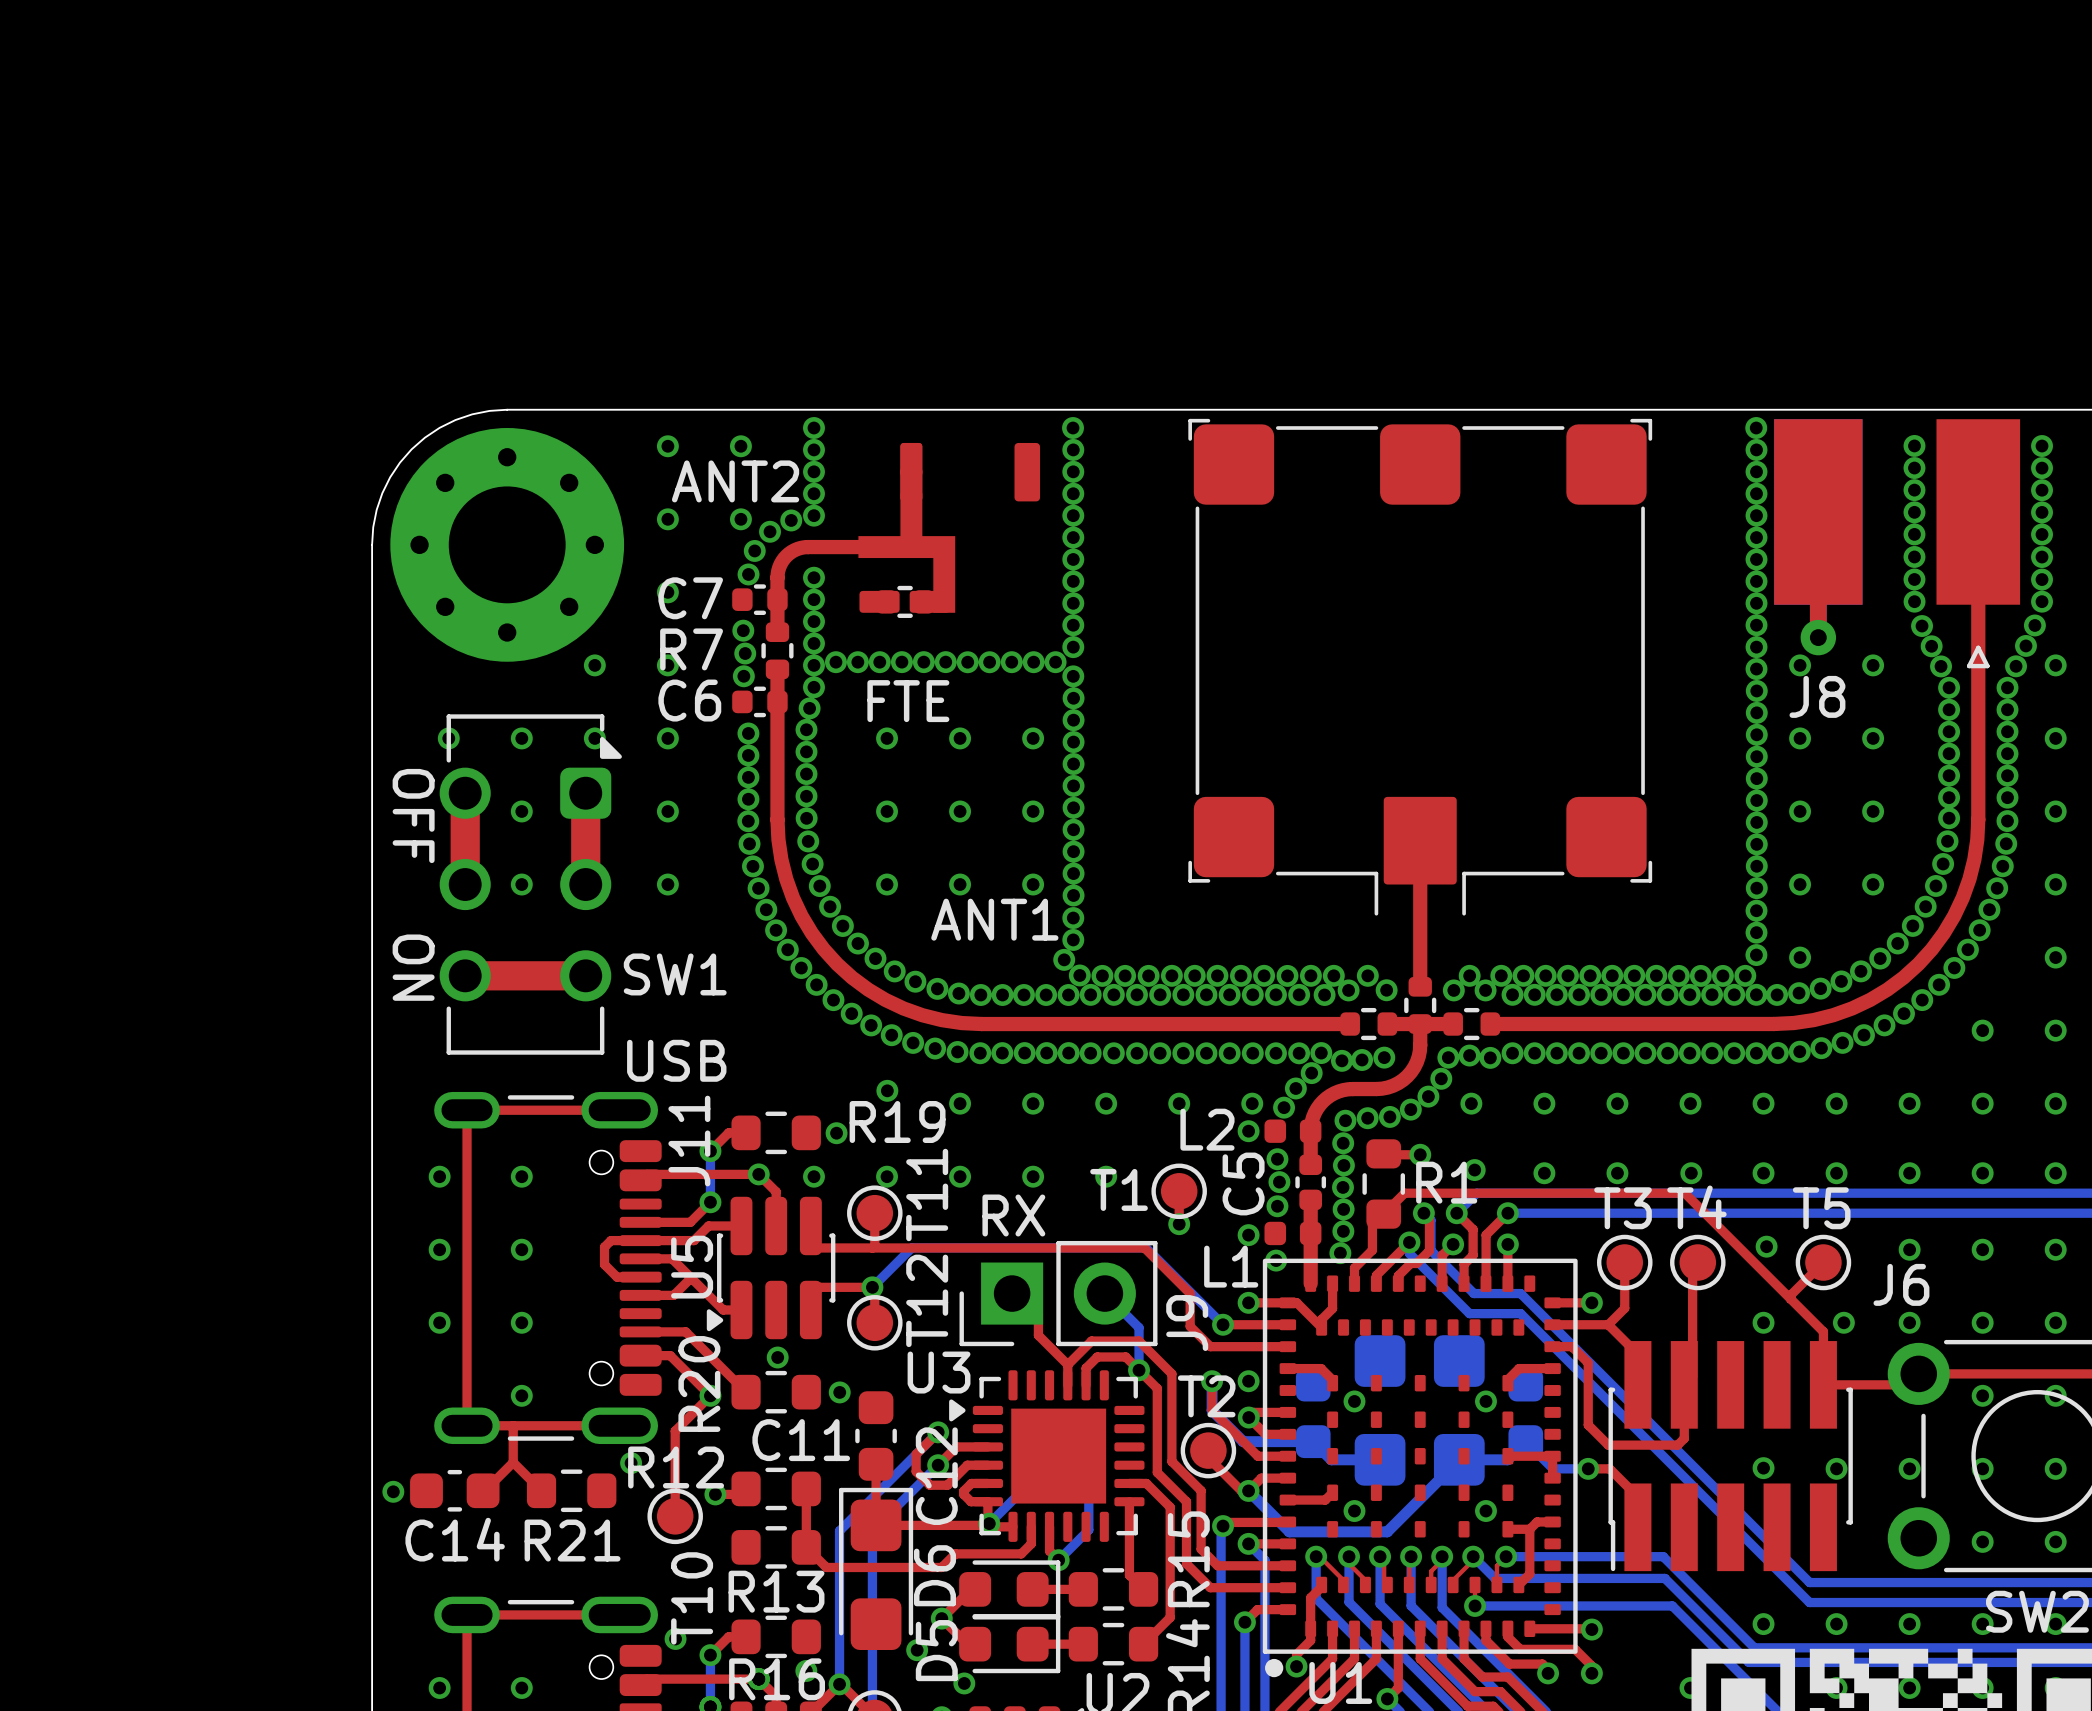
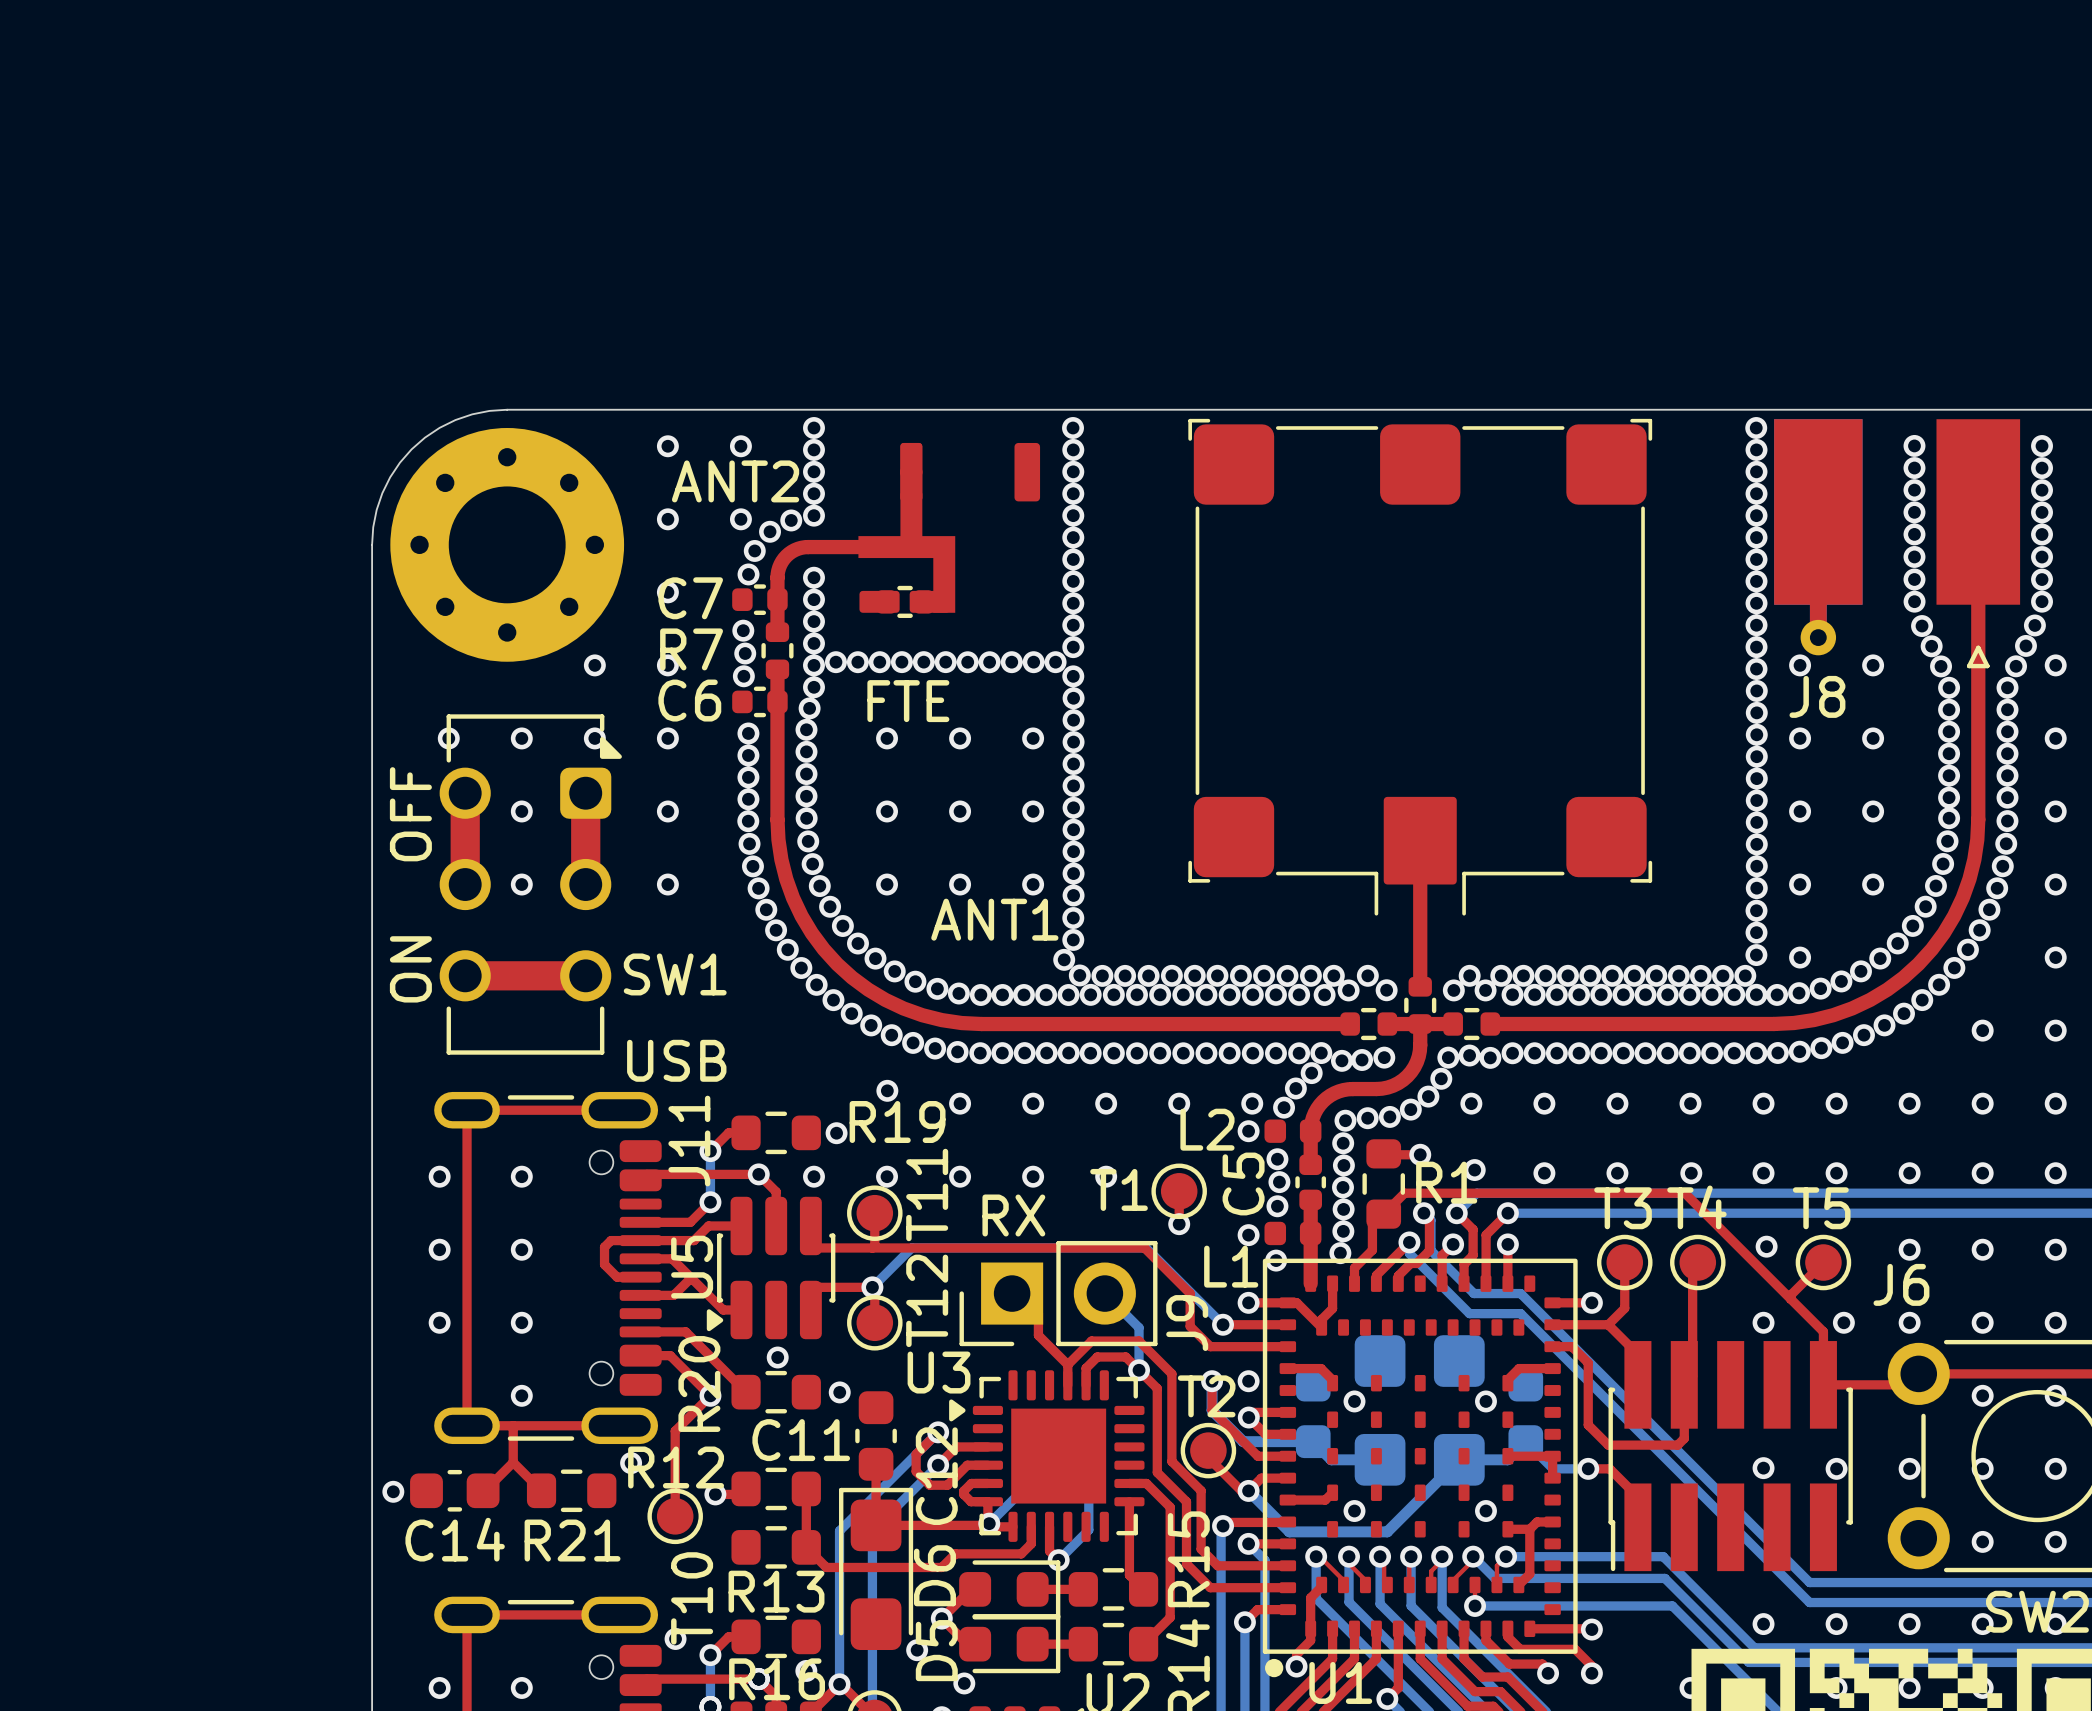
text rotation: 0° (413, 816) -> 180° (410, 814)
text rotation: 0° (413, 967) -> 180° (410, 969)

